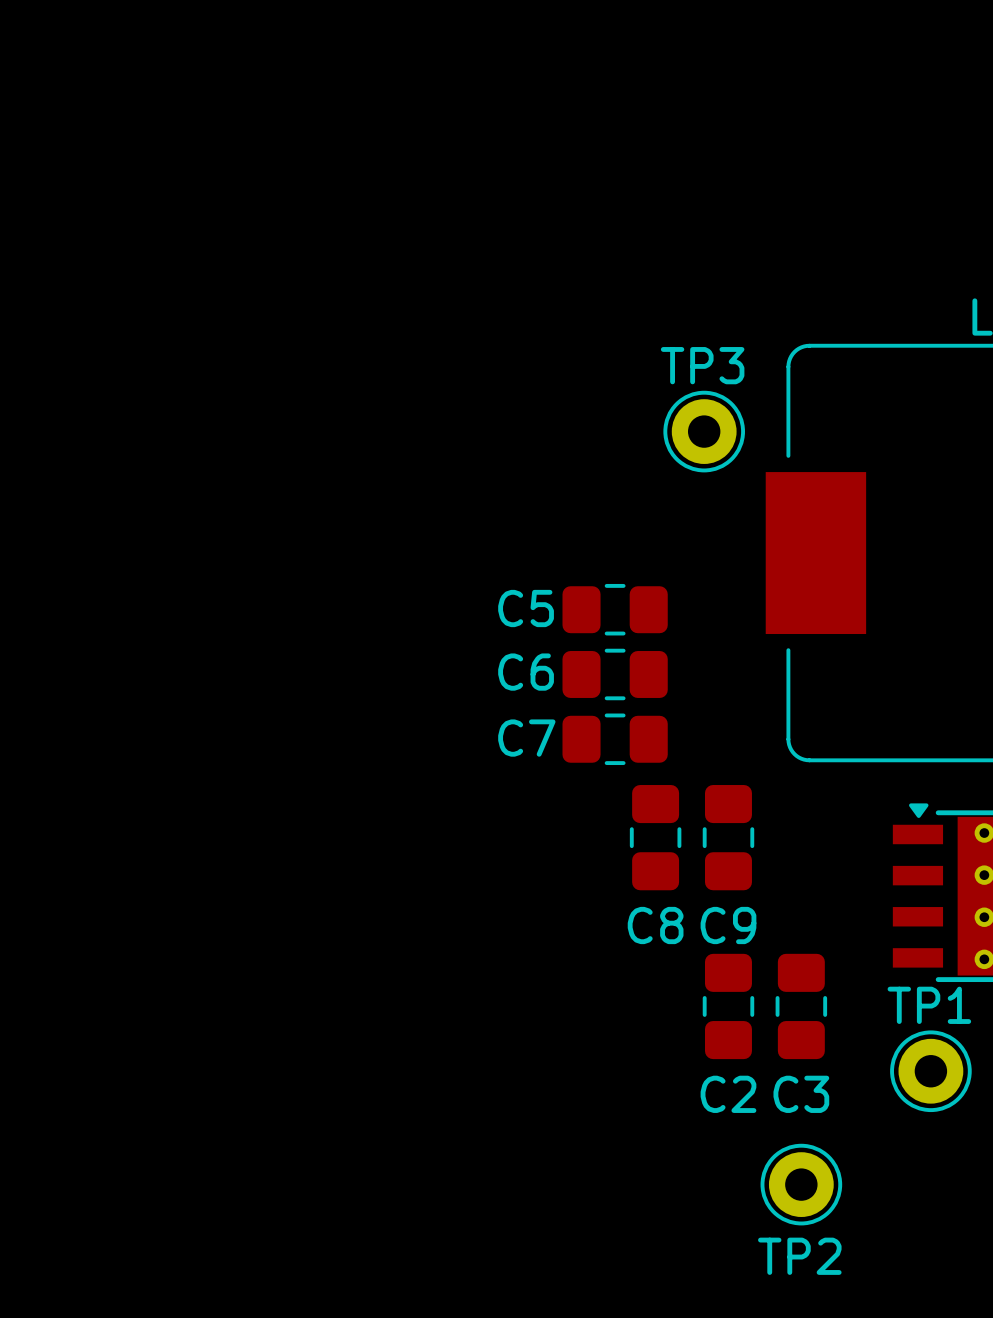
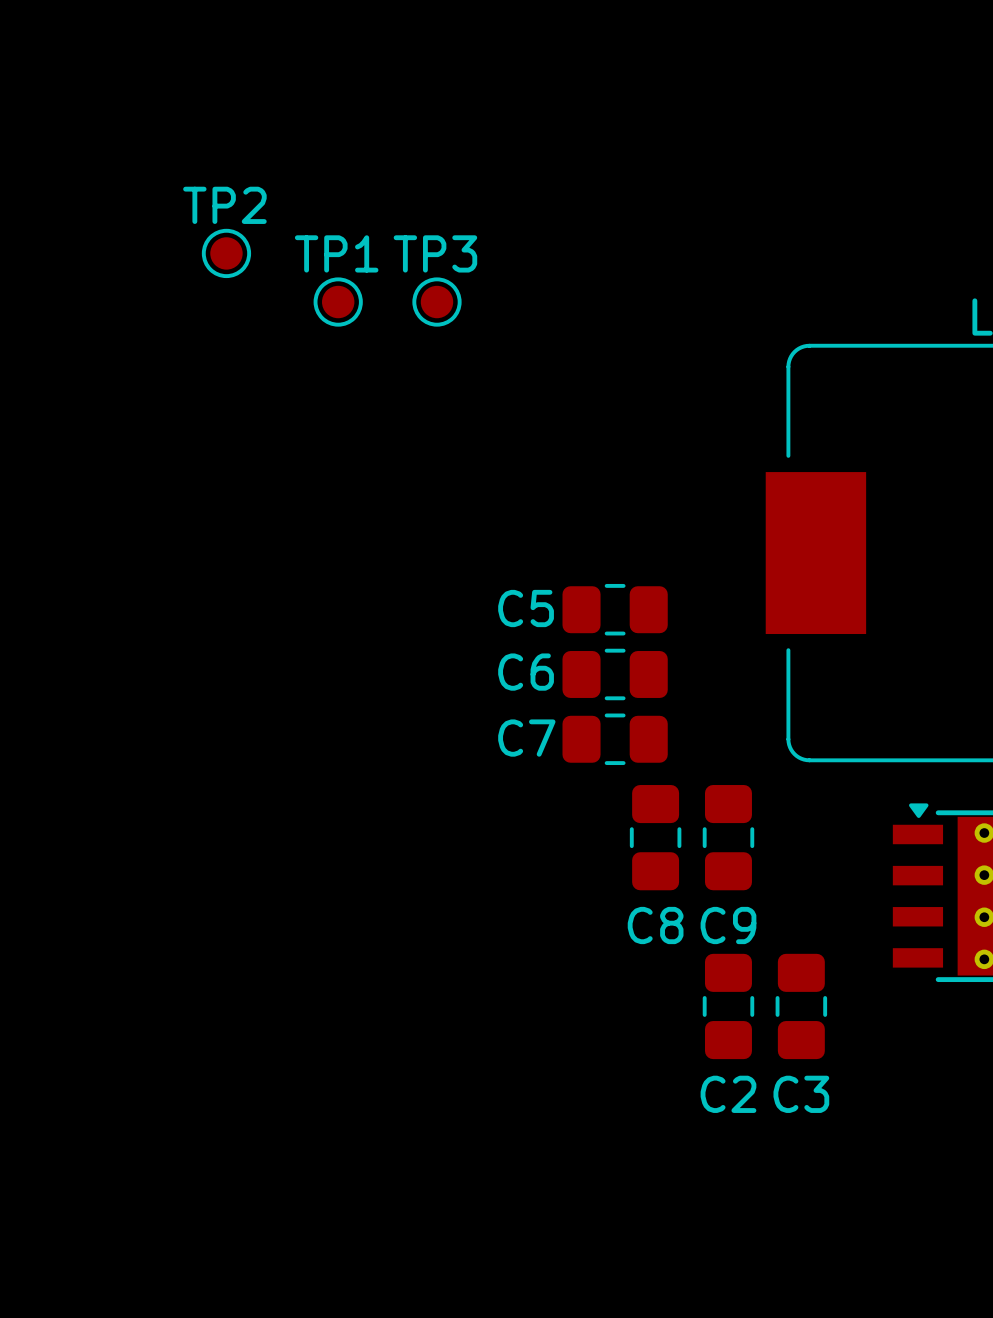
TP3 footprint: [663, 390, 746, 473] -> [412, 277, 462, 327]
TP1 footprint: [890, 1030, 972, 1113] -> [313, 277, 363, 327]
TP2 footprint: [760, 1143, 843, 1226] -> [201, 228, 252, 279]
TP2 name position: TP2 (799, 1256) -> TP2 (224, 205)

